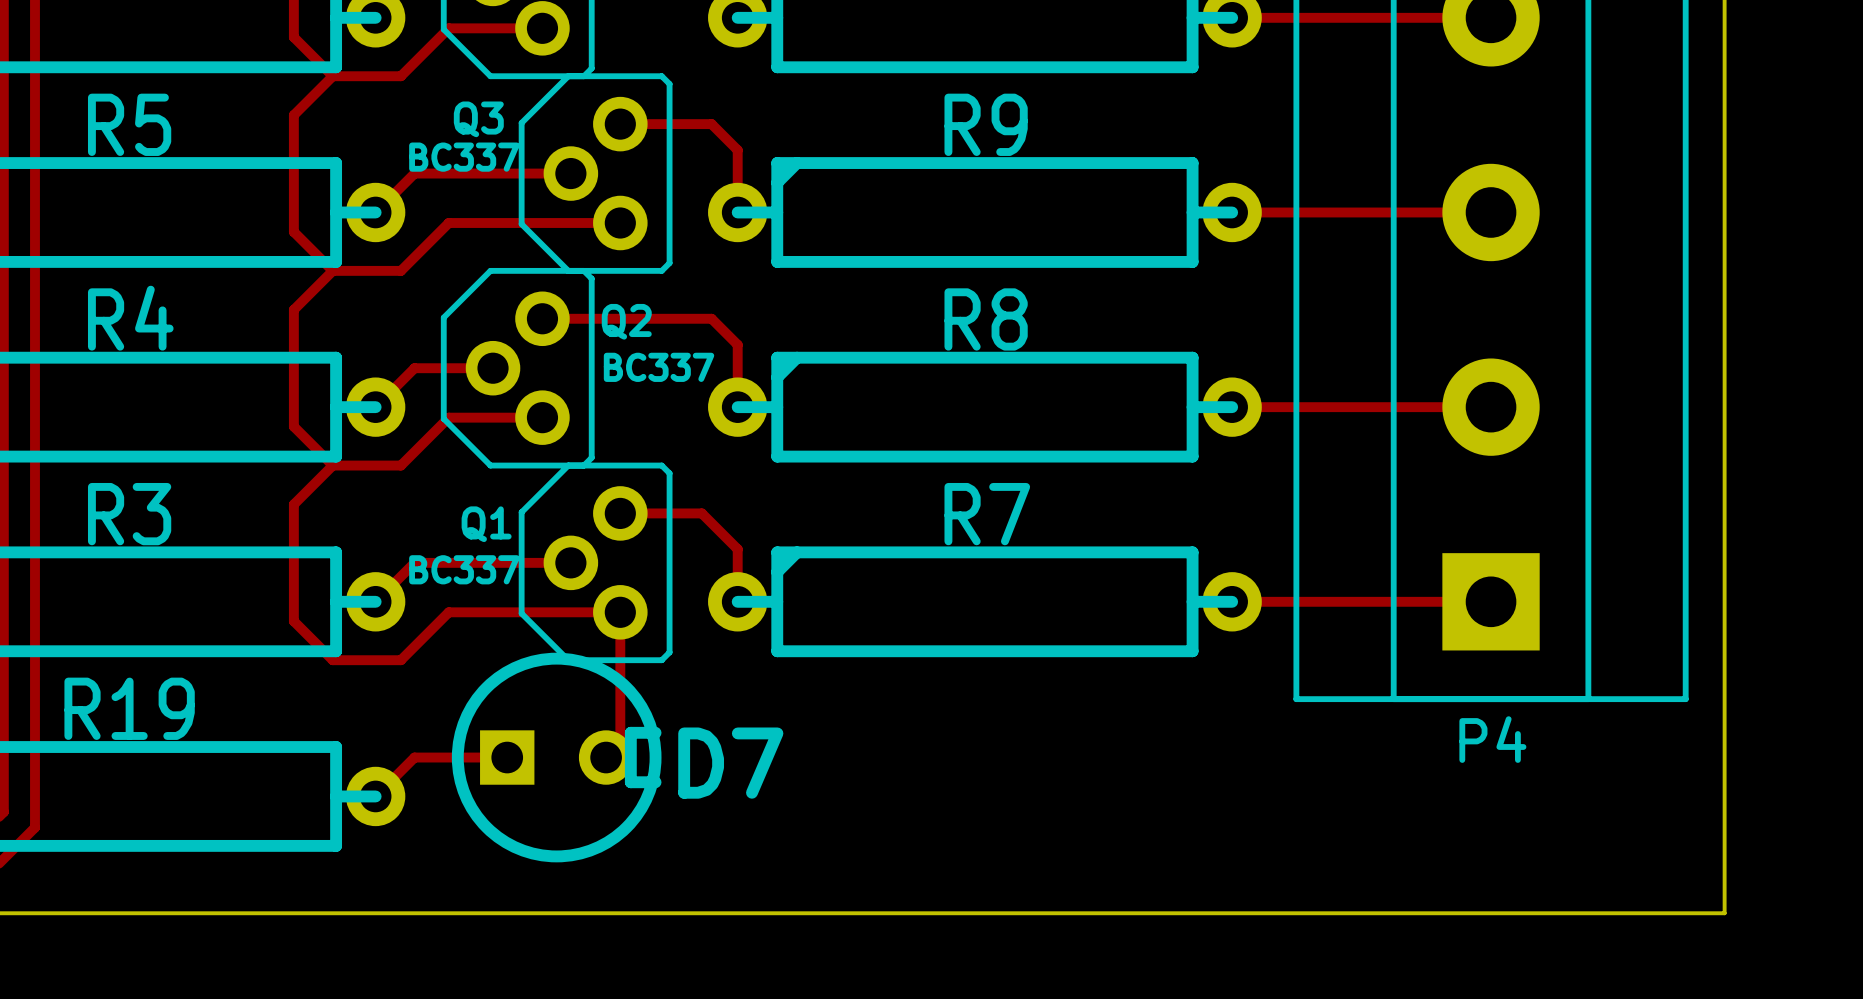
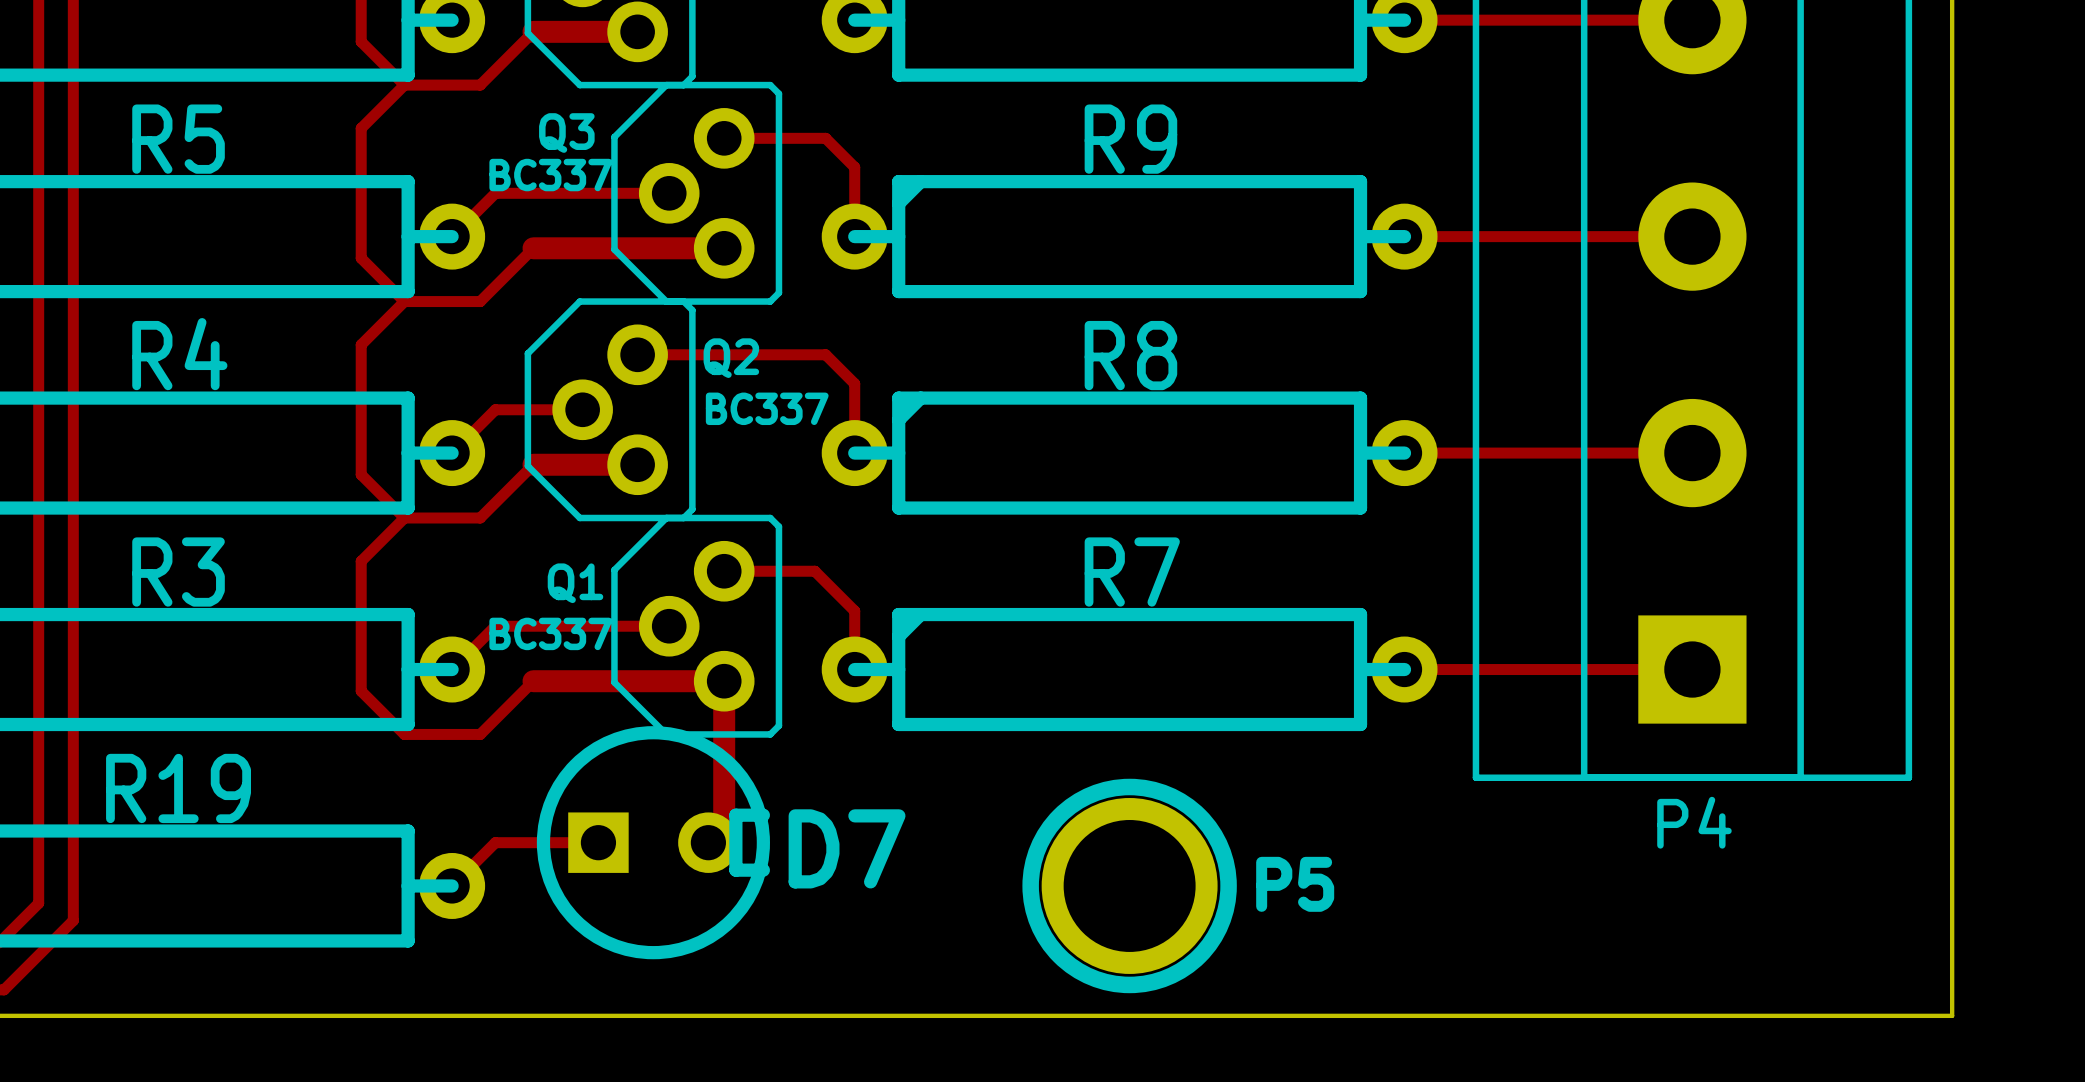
track width: thin (448, 28) (542, 28) -> thick (533, 31) (637, 31)
track width: thin (448, 223) (620, 223) -> thick (533, 248) (724, 248)
track width: thin (448, 417) (542, 417) -> thick (533, 464) (637, 464)
track width: thin (448, 612) (620, 612) (620, 743) -> thick (533, 681) (724, 681) (724, 826)
P5: none -> (1129, 885)

